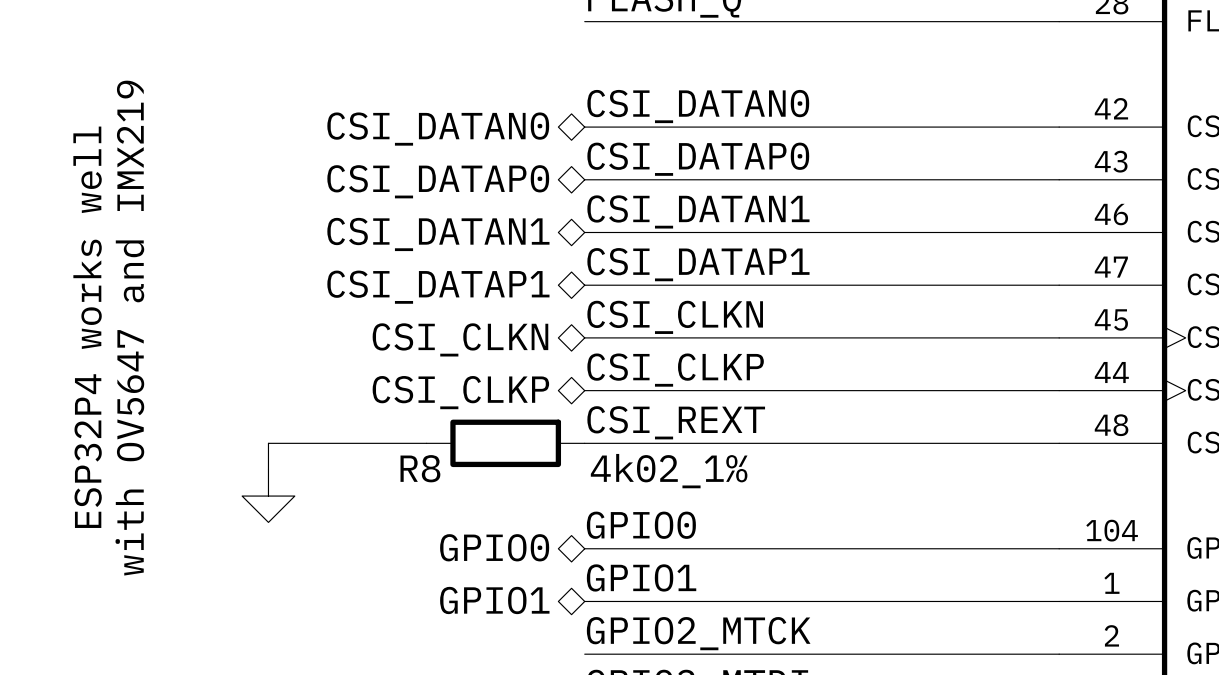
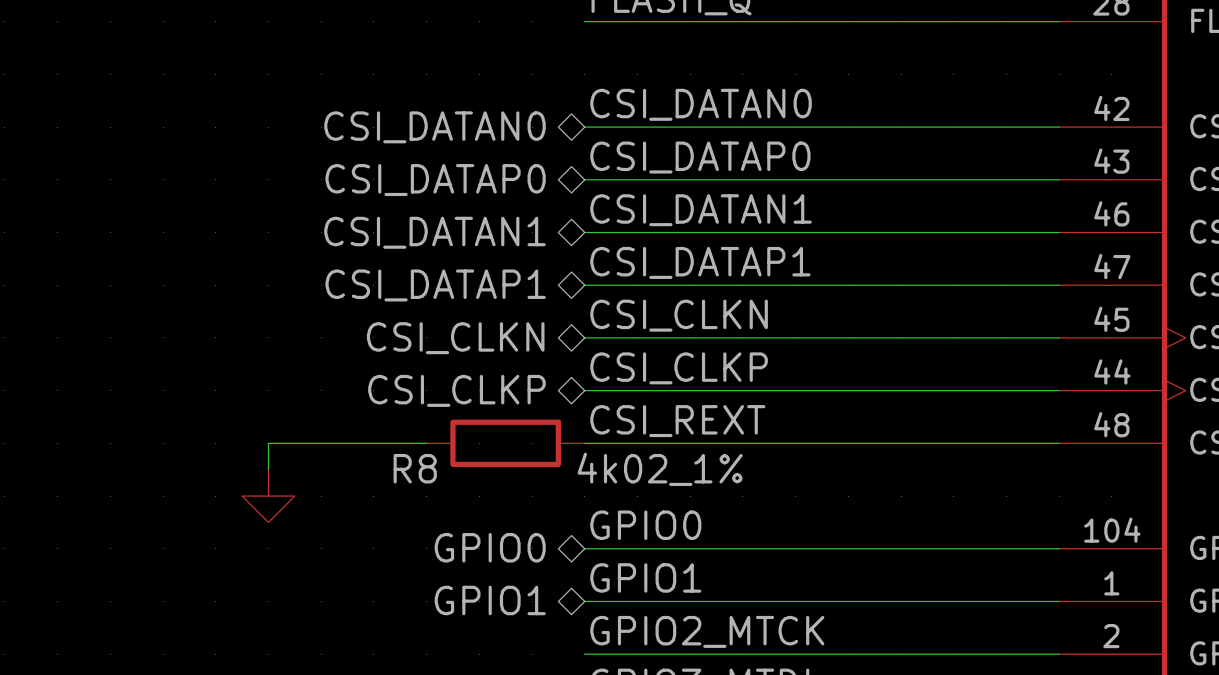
text: ESP32P4 works well (87, 327) -> none
text: with OV5647 and IMX219 (129, 328) -> none

